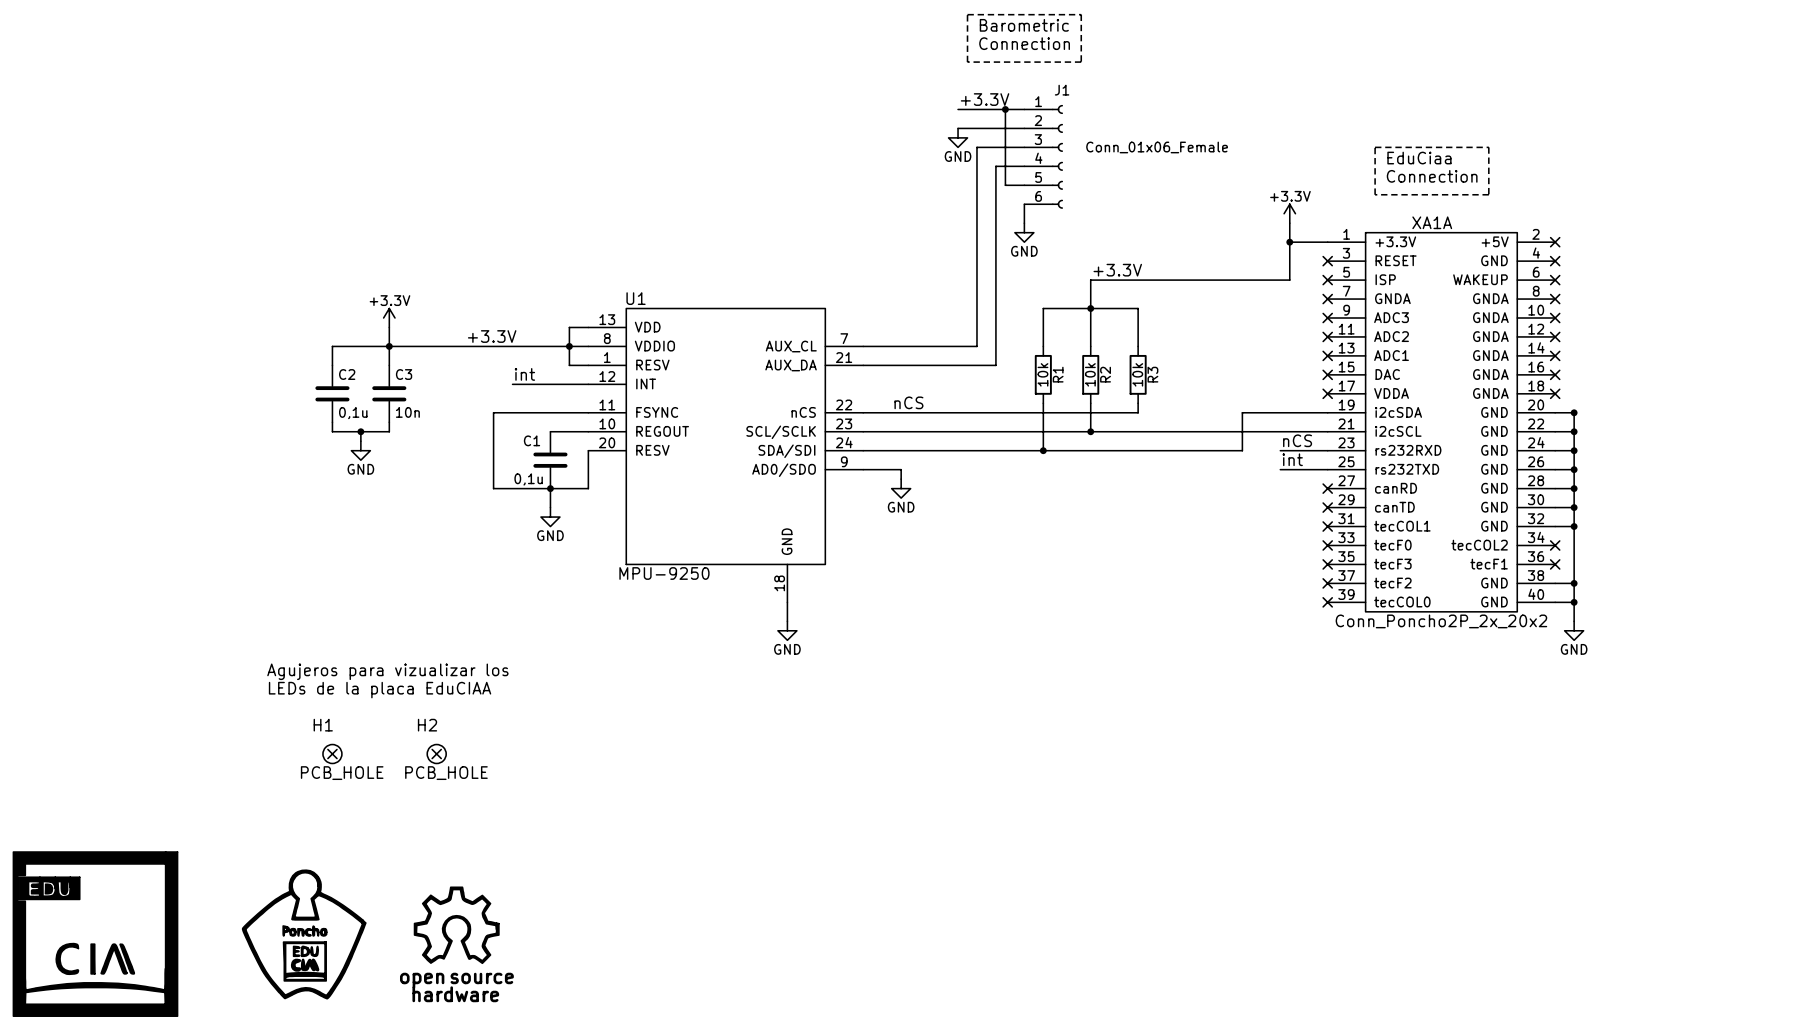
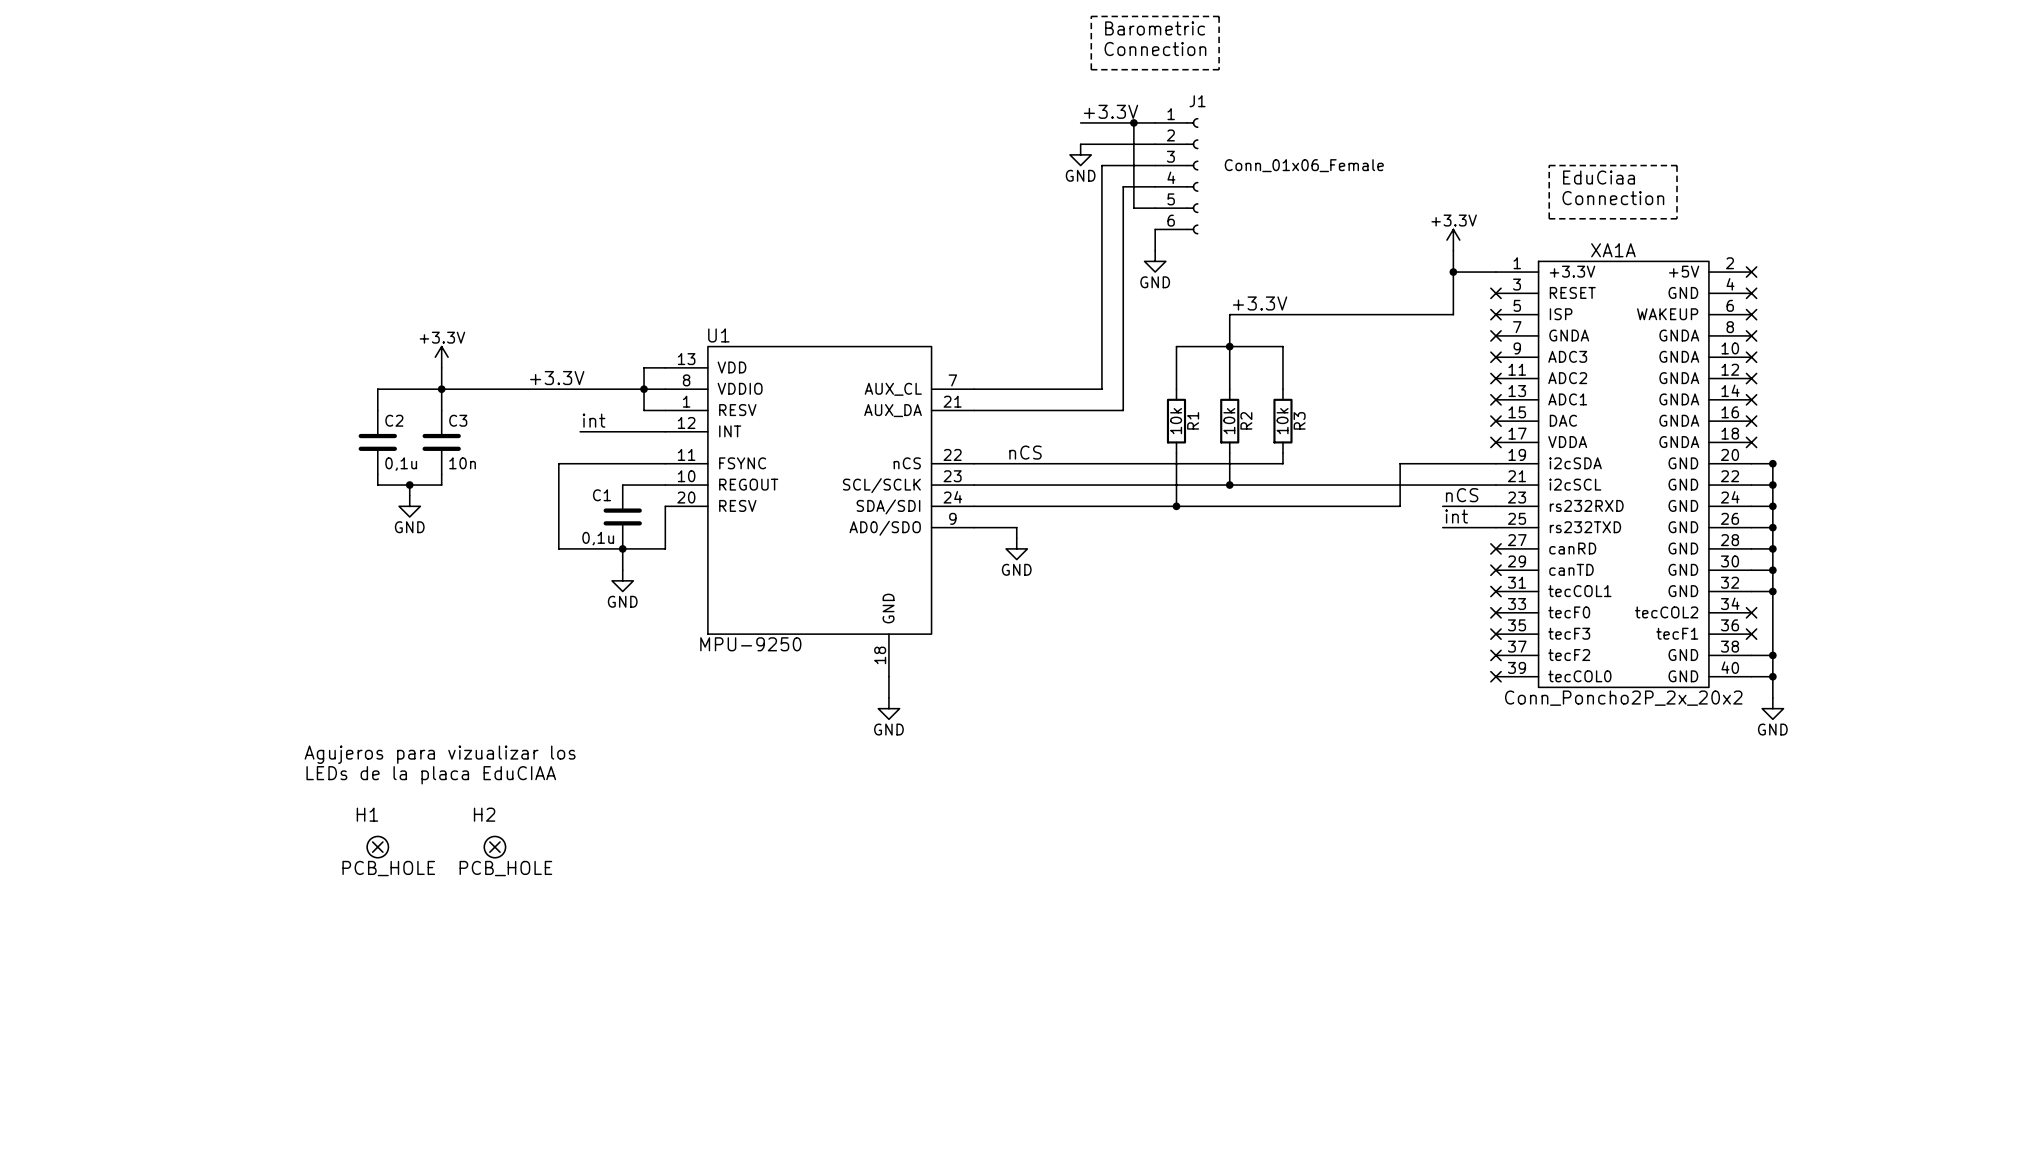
power symbol: (456, 925) -> none
power symbol: (95, 934) -> none
power symbol: (304, 934) -> none

